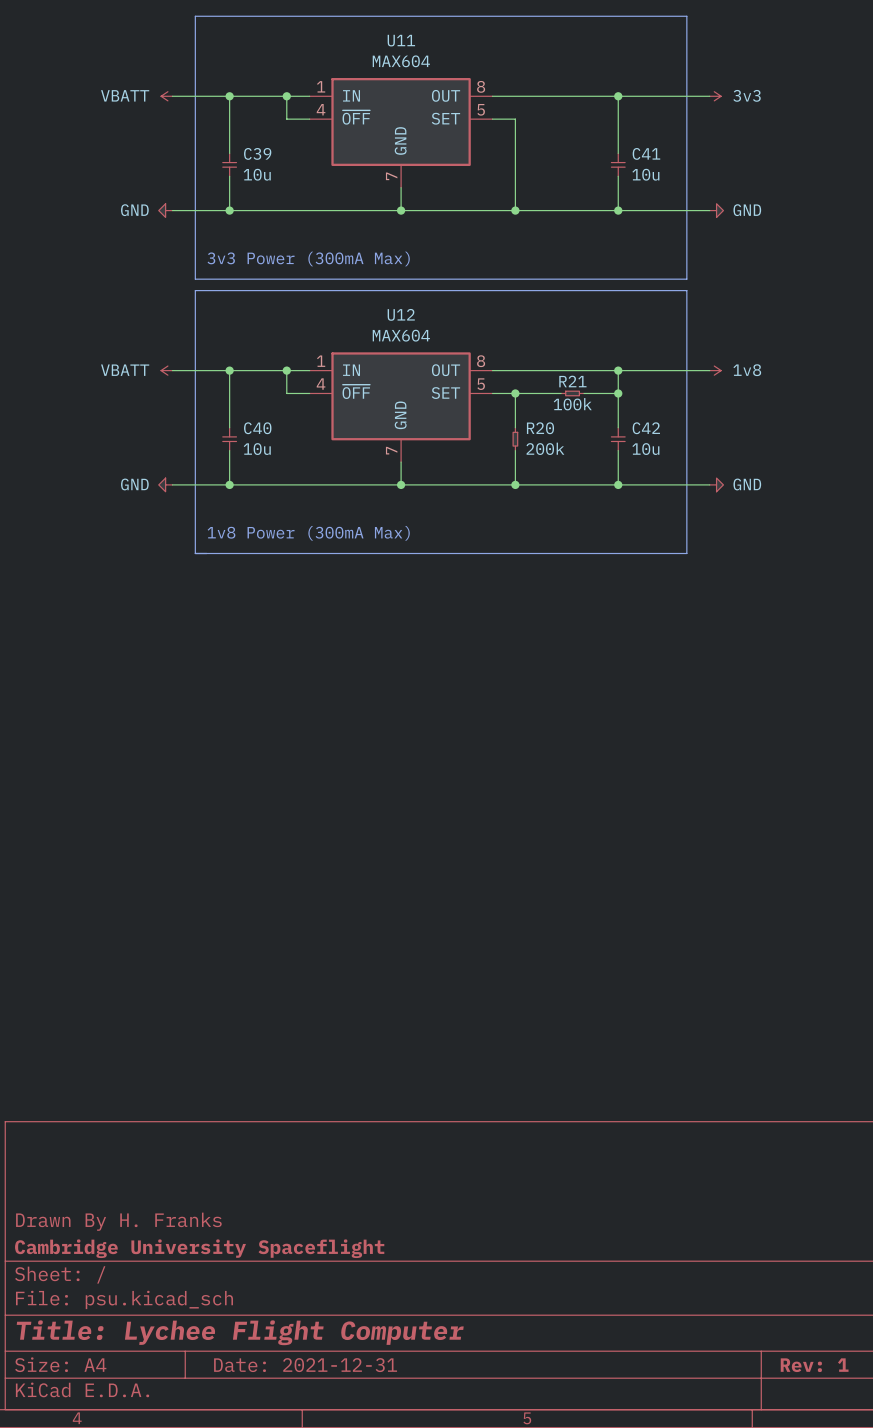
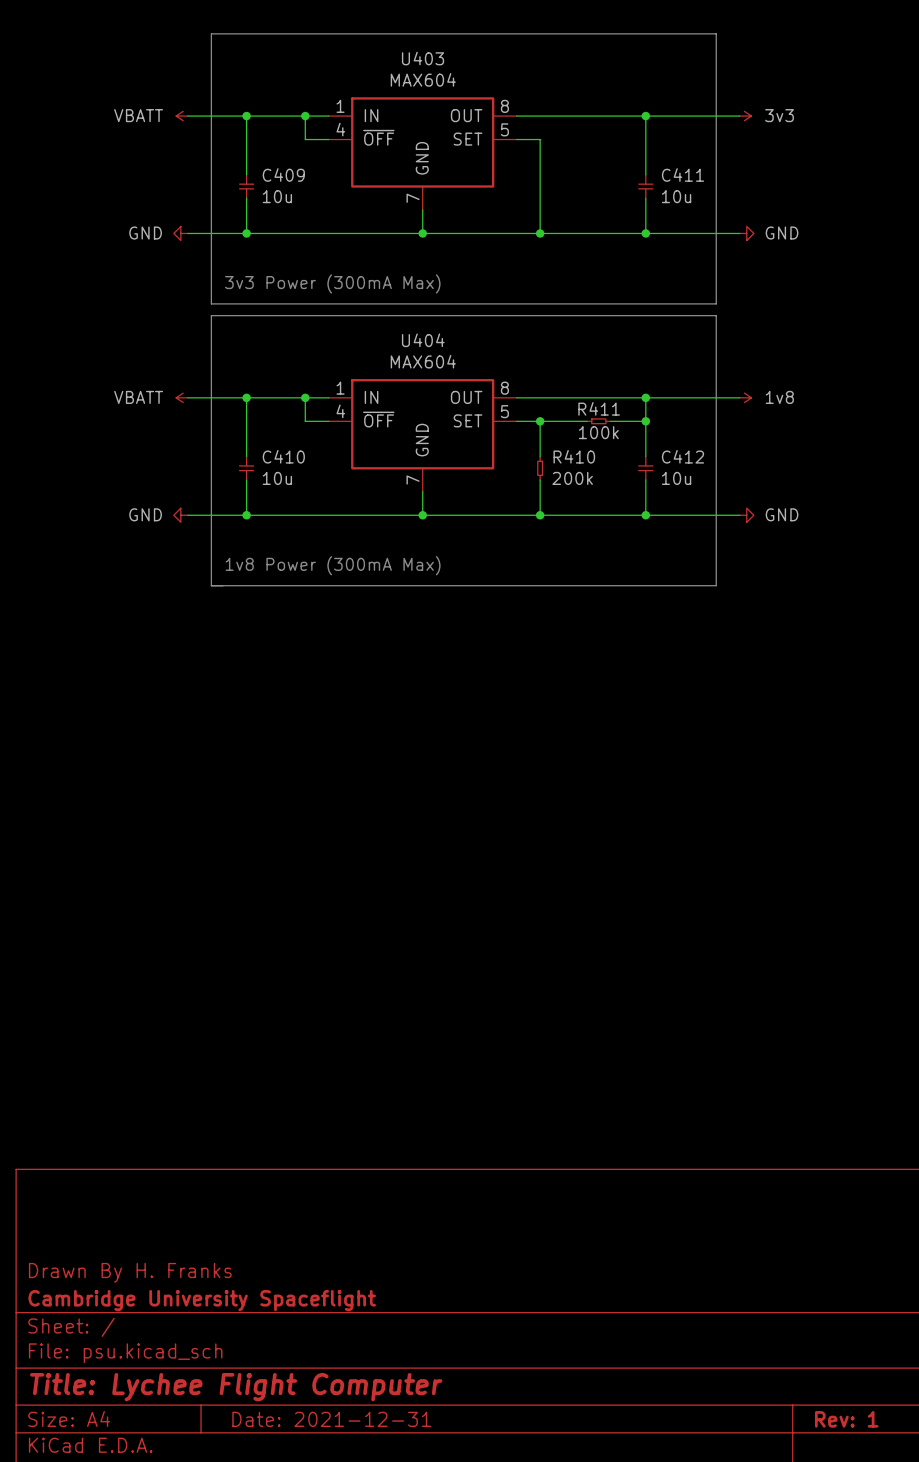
U11 name: U11 (401, 40) -> U403 (423, 58)
C39 name: C39 (257, 153) -> C409 (283, 174)
C41 name: C41 (646, 153) -> C411 (682, 174)
U12 name: U12 (401, 314) -> U404 (423, 340)
R21 name: R21 (572, 381) -> R411 (599, 408)
C40 name: C40 (257, 428) -> C410 (283, 456)
R20 name: R20 (540, 428) -> R410 (574, 456)
C42 name: C42 (646, 428) -> C412 (682, 456)

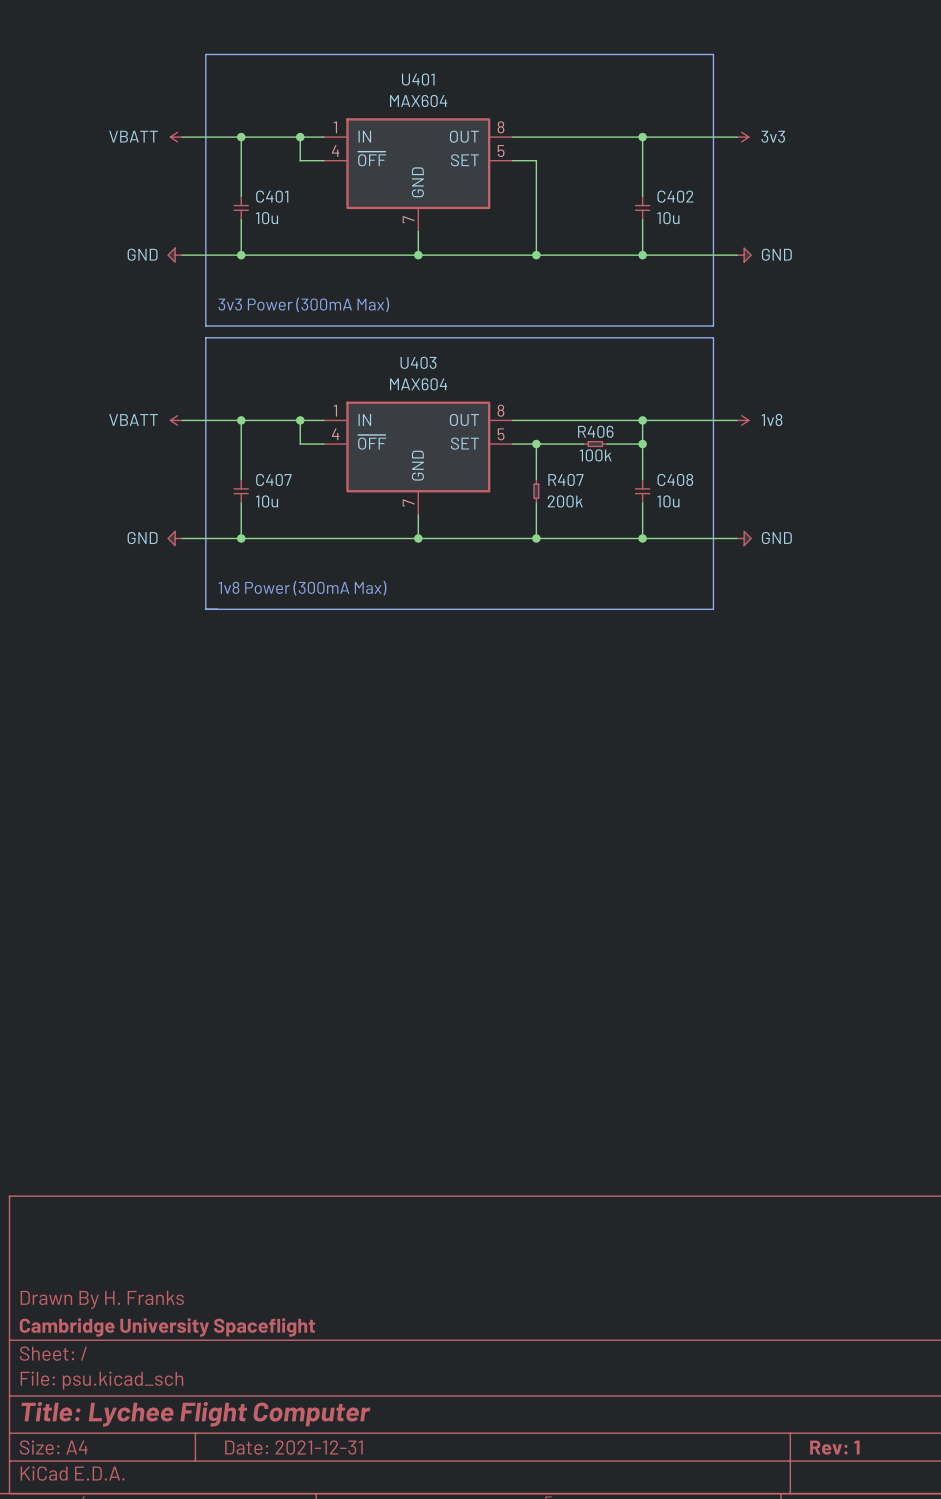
U403 name: U403 (423, 58) -> U401 (418, 79)
C409 name: C409 (283, 174) -> C401 (272, 196)
C411 name: C411 (682, 174) -> C402 (675, 196)
U404 name: U404 (423, 340) -> U403 (418, 362)
R411 name: R411 (599, 408) -> R406 (595, 431)
C410 name: C410 (283, 456) -> C407 (273, 479)
R410 name: R410 (574, 456) -> R407 (565, 479)
C412 name: C412 (682, 456) -> C408 (675, 479)

